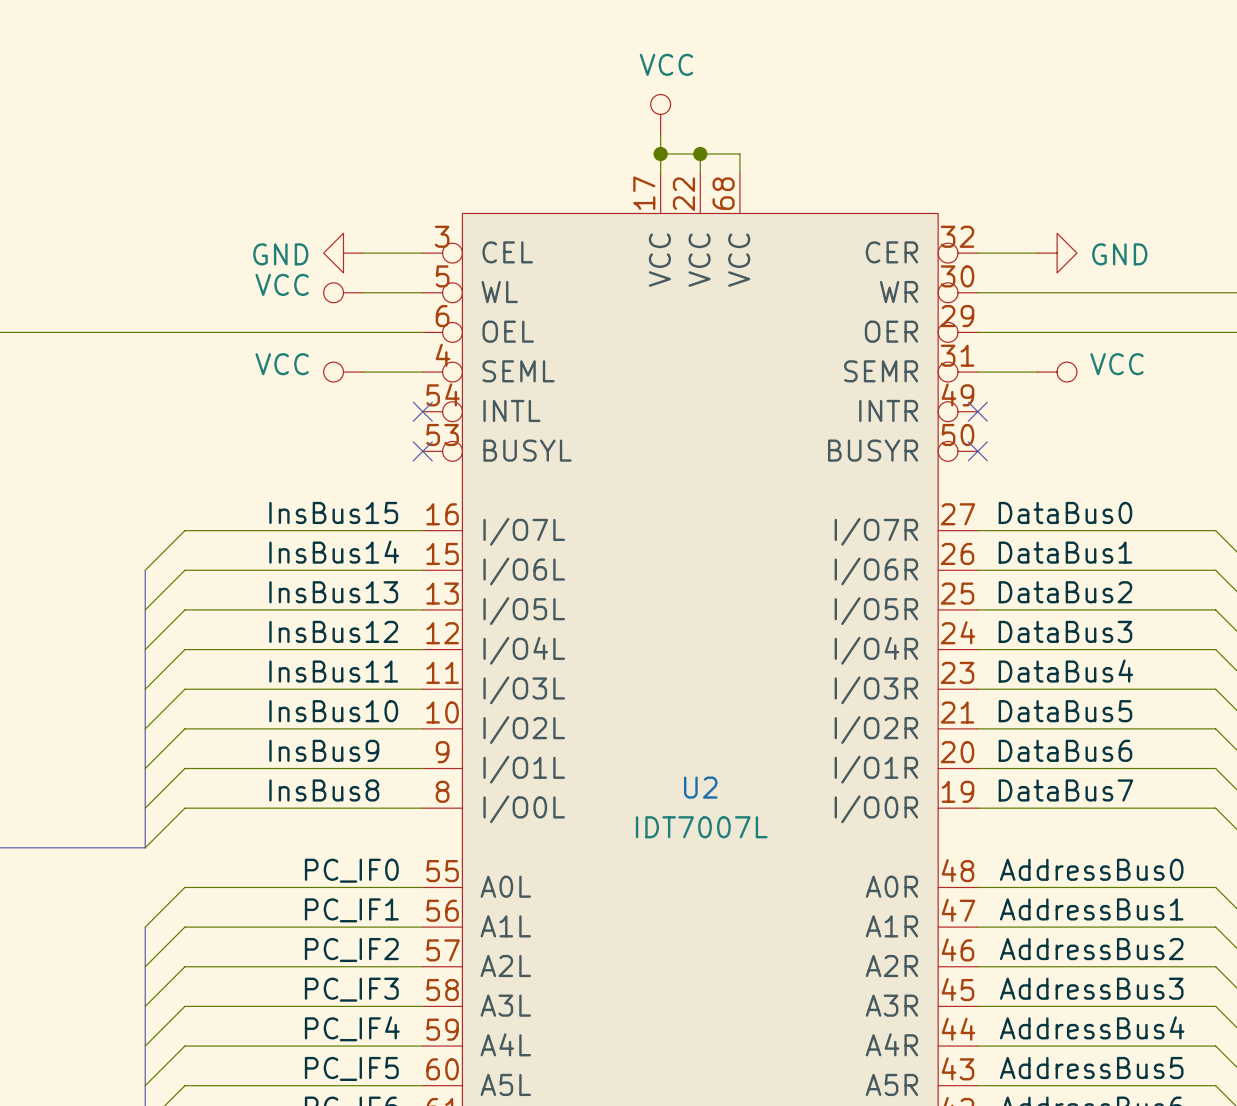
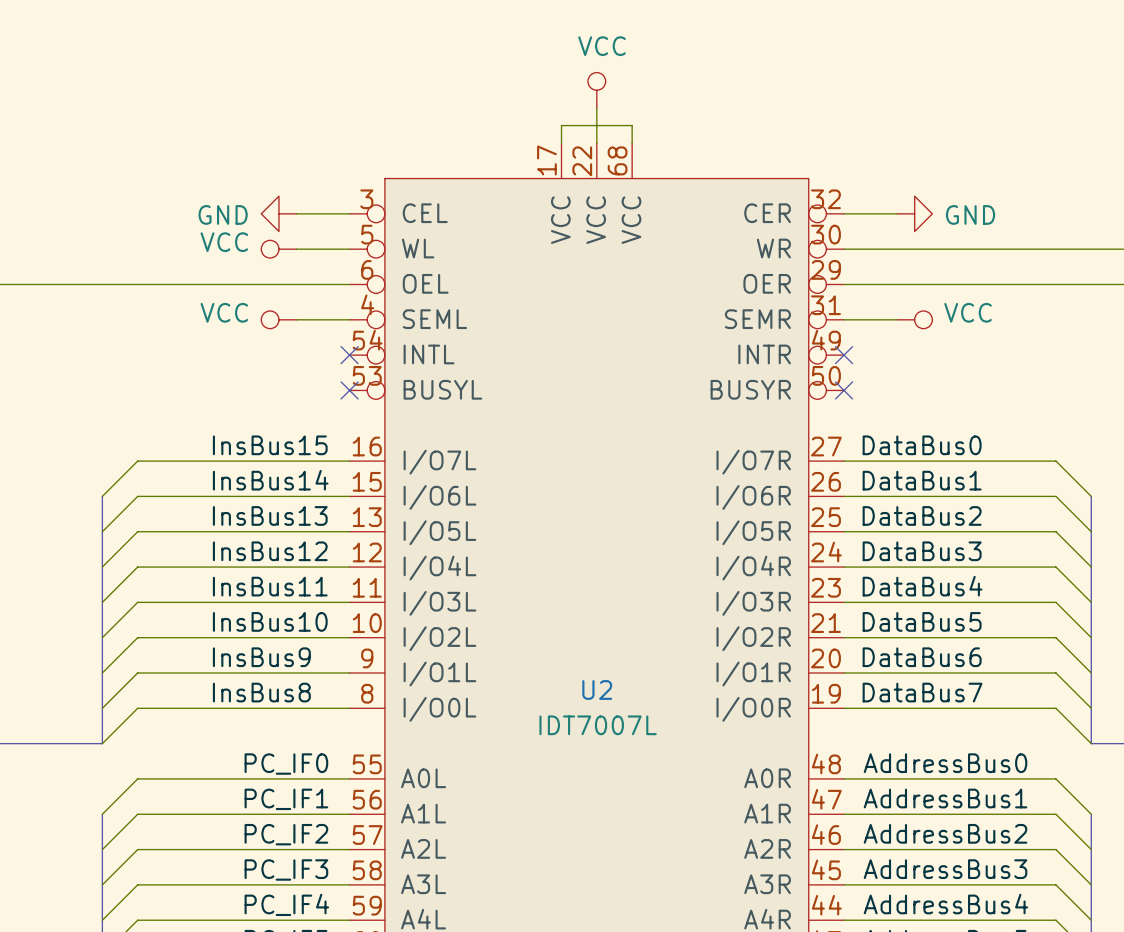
power symbol position: VCC (660, 114) -> VCC (596, 90)
wire: (660, 134) (660, 154) -> (596, 107) (596, 125)
junction: (660, 154) -> none
junction: (700, 154) -> none

